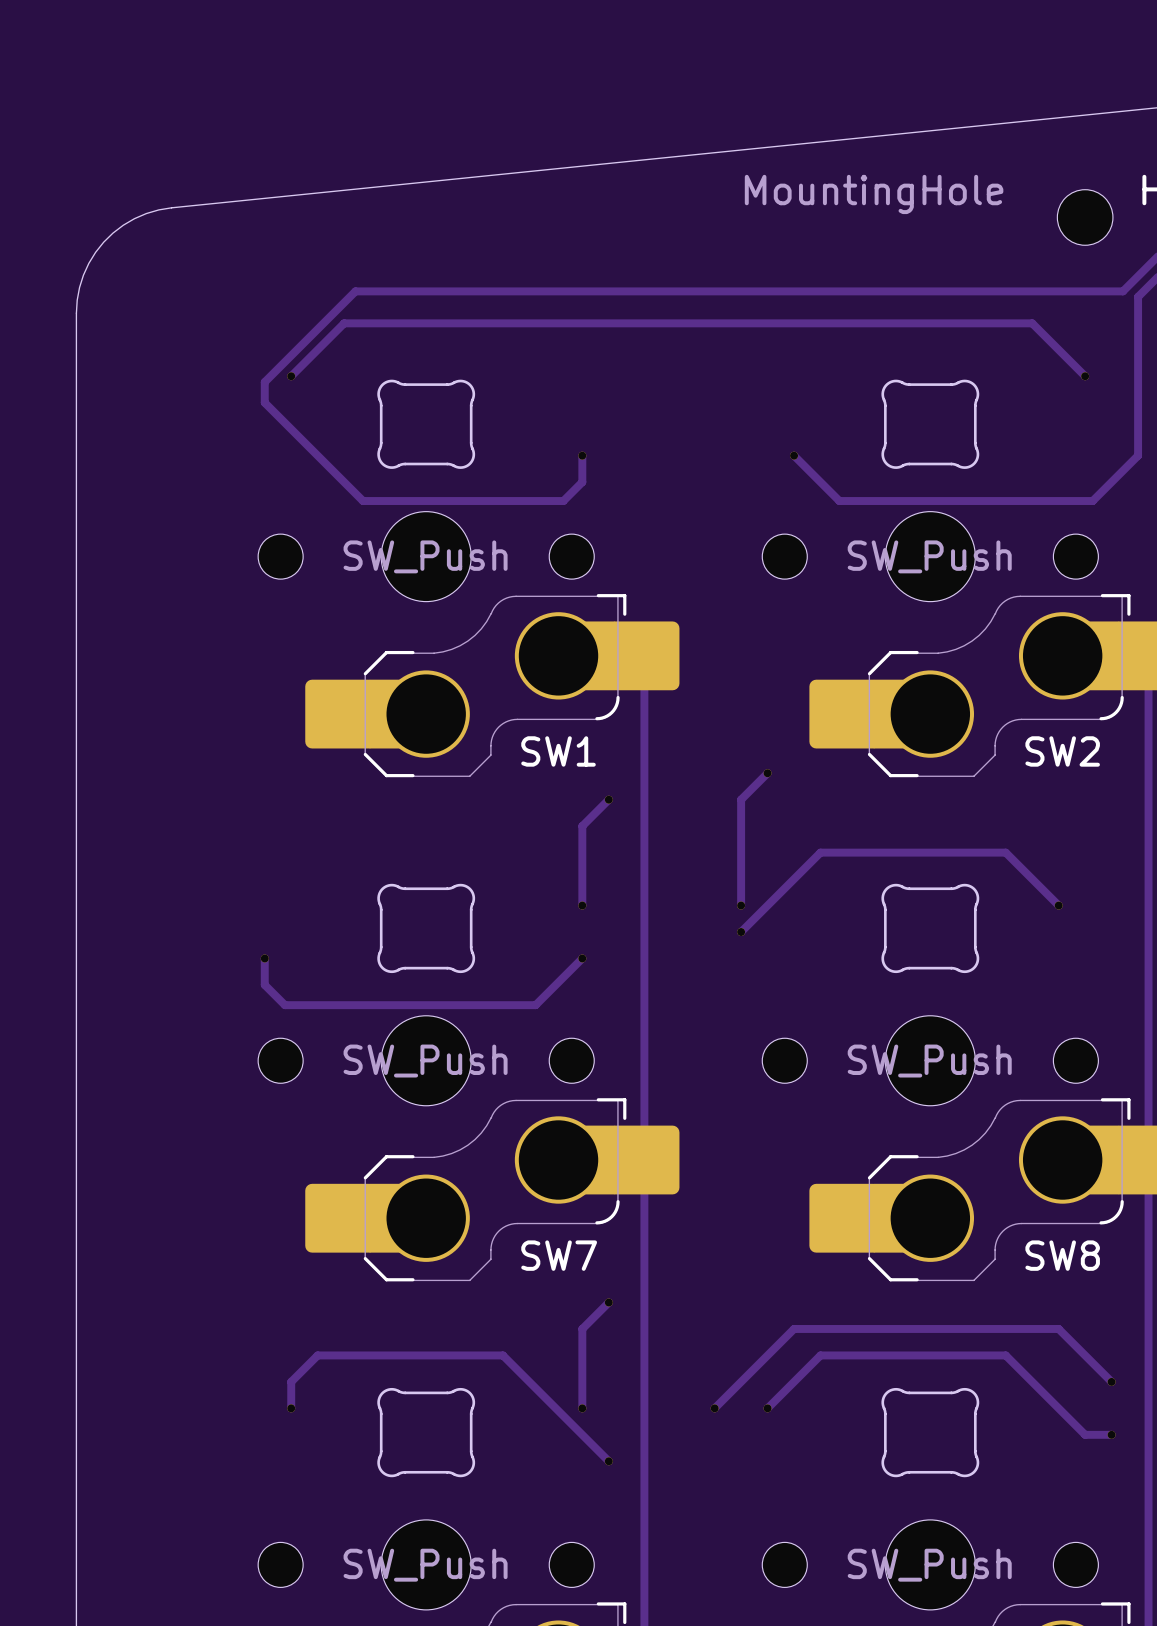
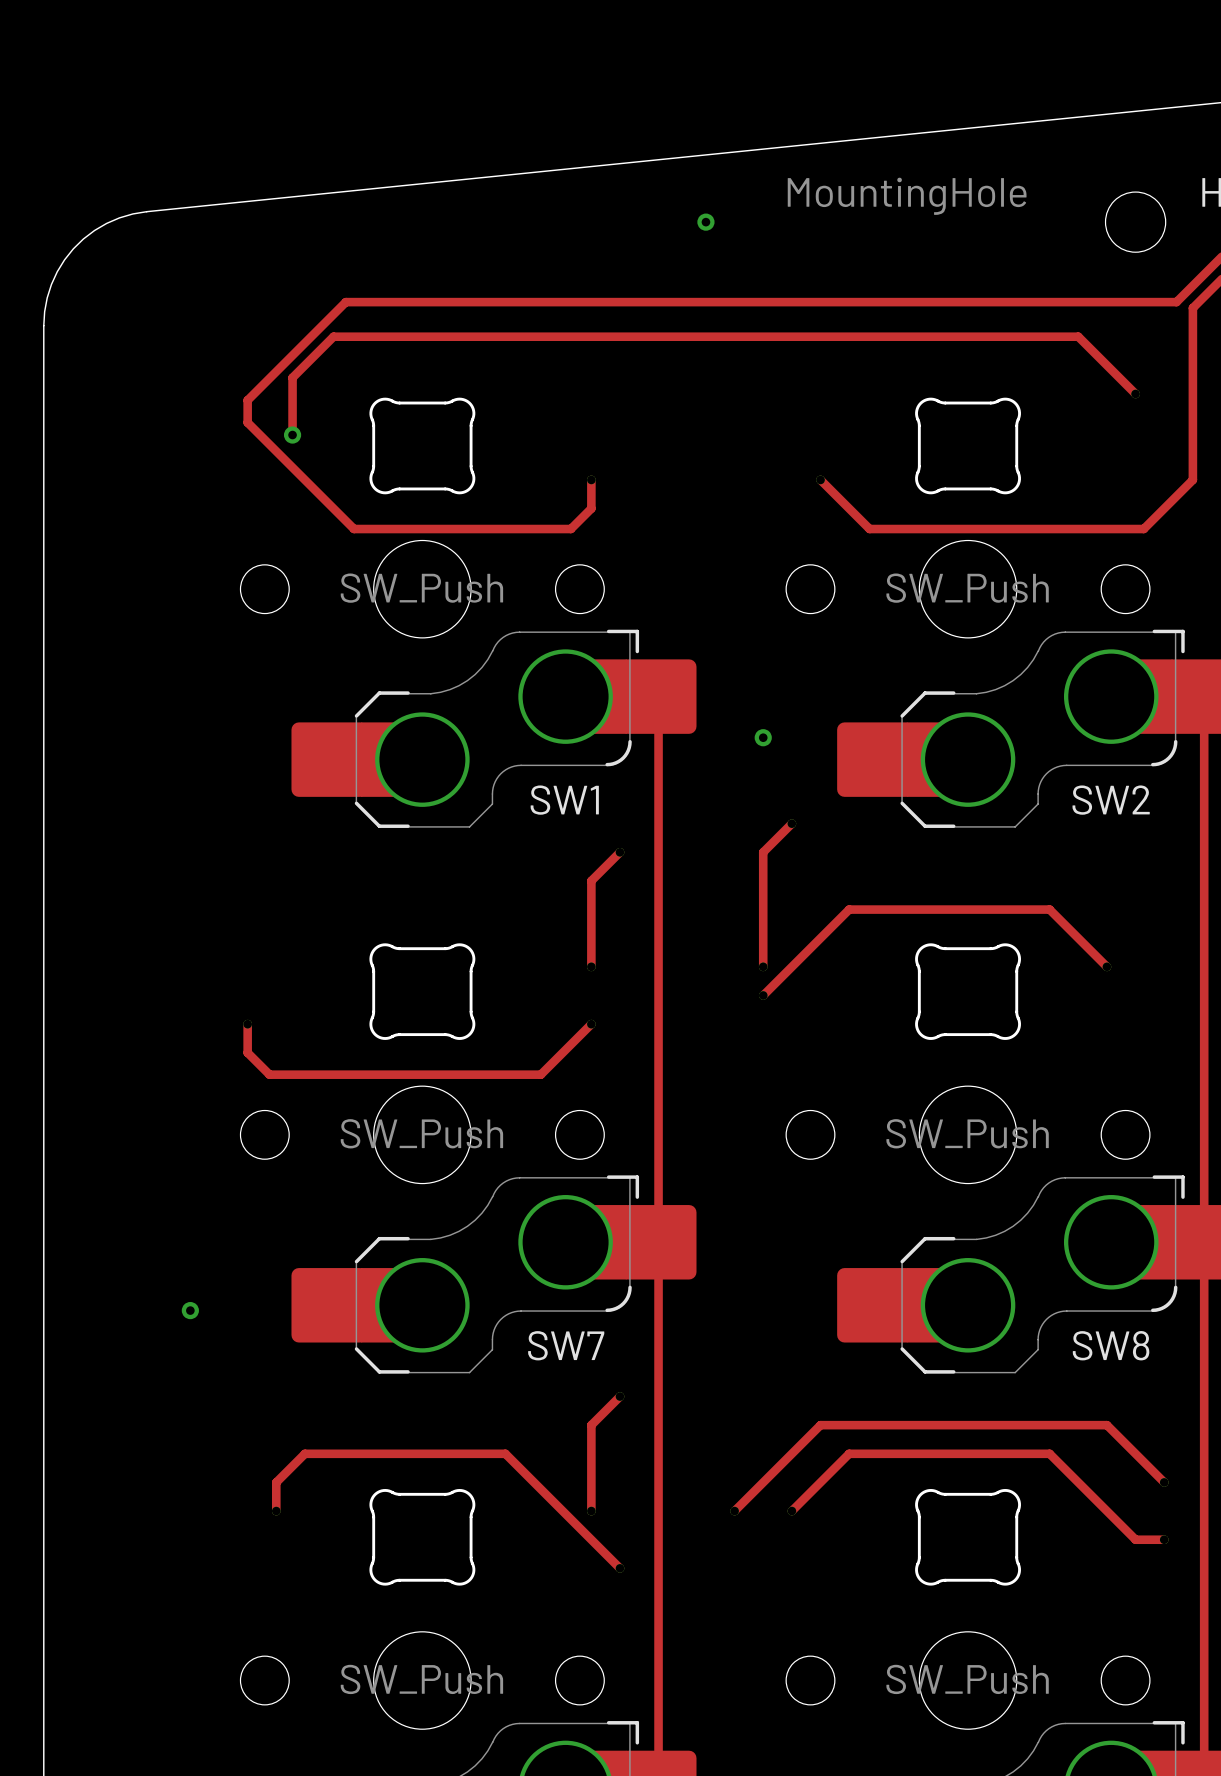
via: none -> (705, 222)
track: (306, 361) (291, 376) -> (292, 377) (292, 435)
via: (291, 376) -> none
via: none -> (292, 435)
via: none -> (763, 737)
via: none -> (190, 1310)

